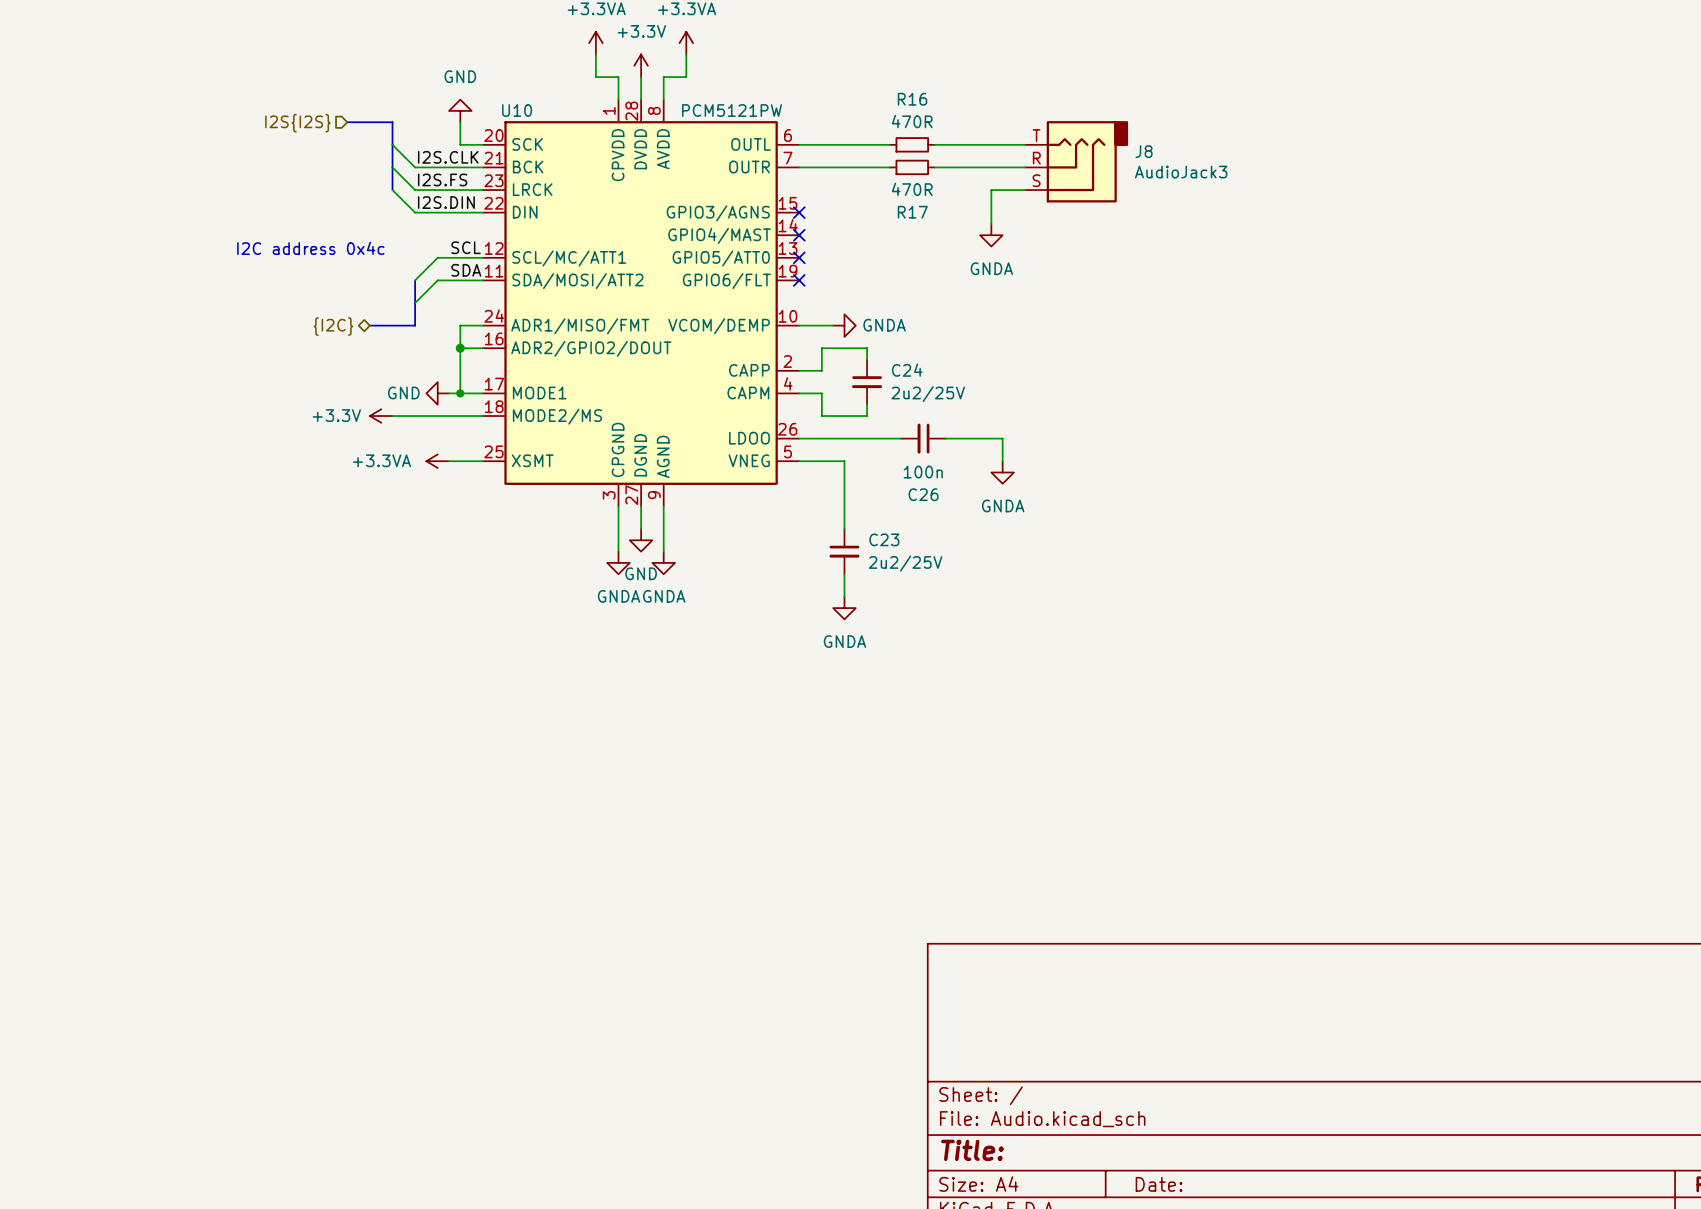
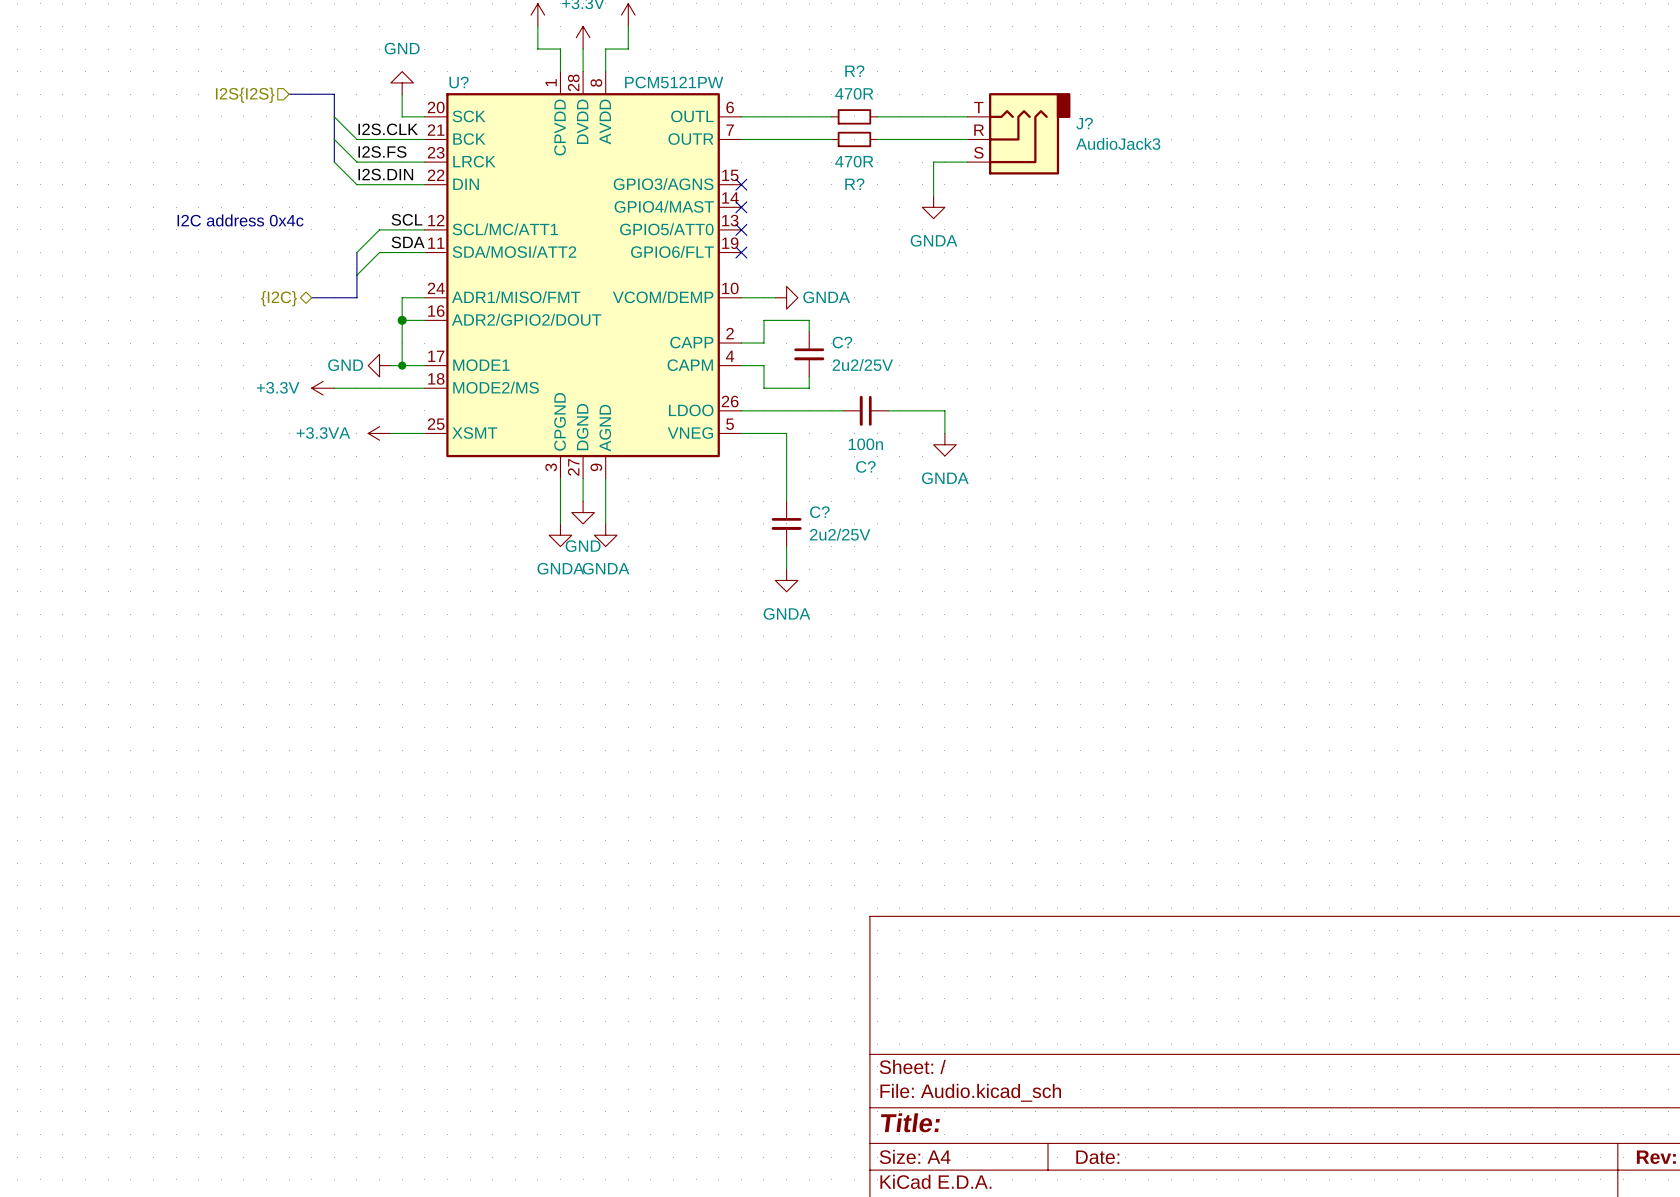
R16 name: R16 (912, 99) -> R? (854, 71)
U10 name: U10 (517, 110) -> U? (459, 82)
J8 name: J8 (1144, 151) -> J? (1084, 123)
R17 name: R17 (912, 212) -> R? (854, 184)
C24 name: C24 (907, 370) -> C? (842, 342)
C26 name: C26 (923, 494) -> C? (865, 466)
C23 name: C23 (884, 539) -> C? (819, 512)

